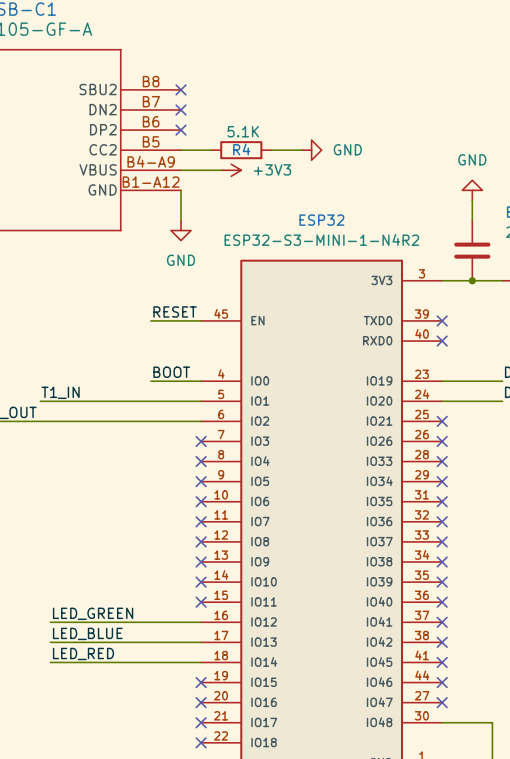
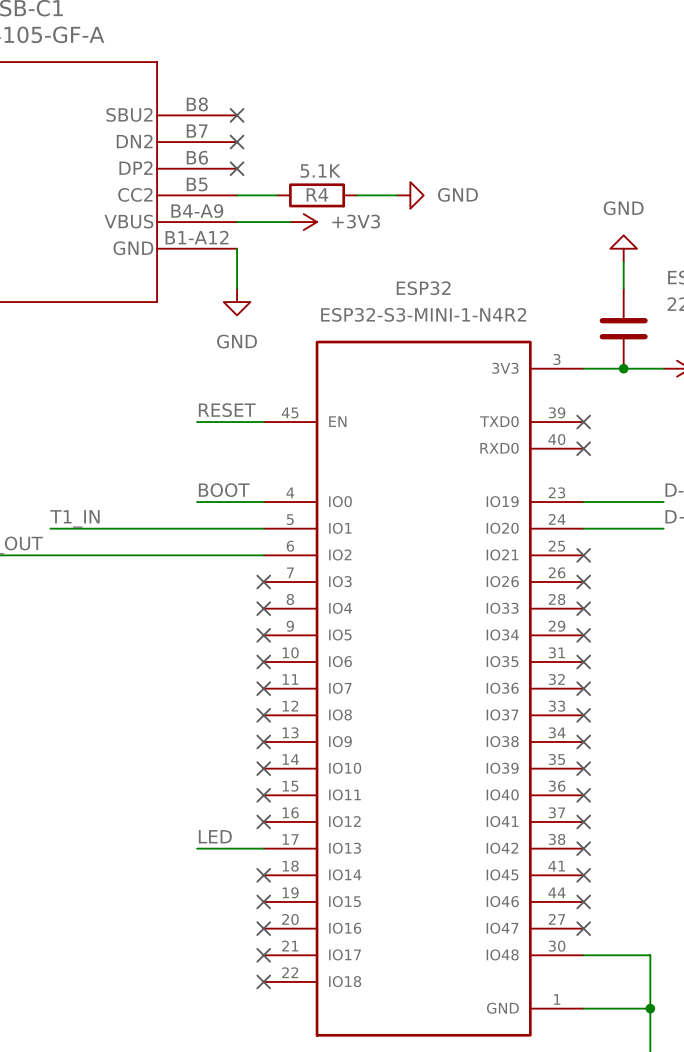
label: LED_GREEN (93, 613) -> none
wire: (50, 622) (201, 622) -> none
no-connect mark: none -> (263, 821)
label: LED_BLUE (87, 633) -> none
label: none -> LED (215, 836)
wire: (50, 642) (150, 642) -> none
label: LED_RED (83, 653) -> none
wire: (50, 662) (201, 662) -> none
no-connect mark: none -> (263, 875)

